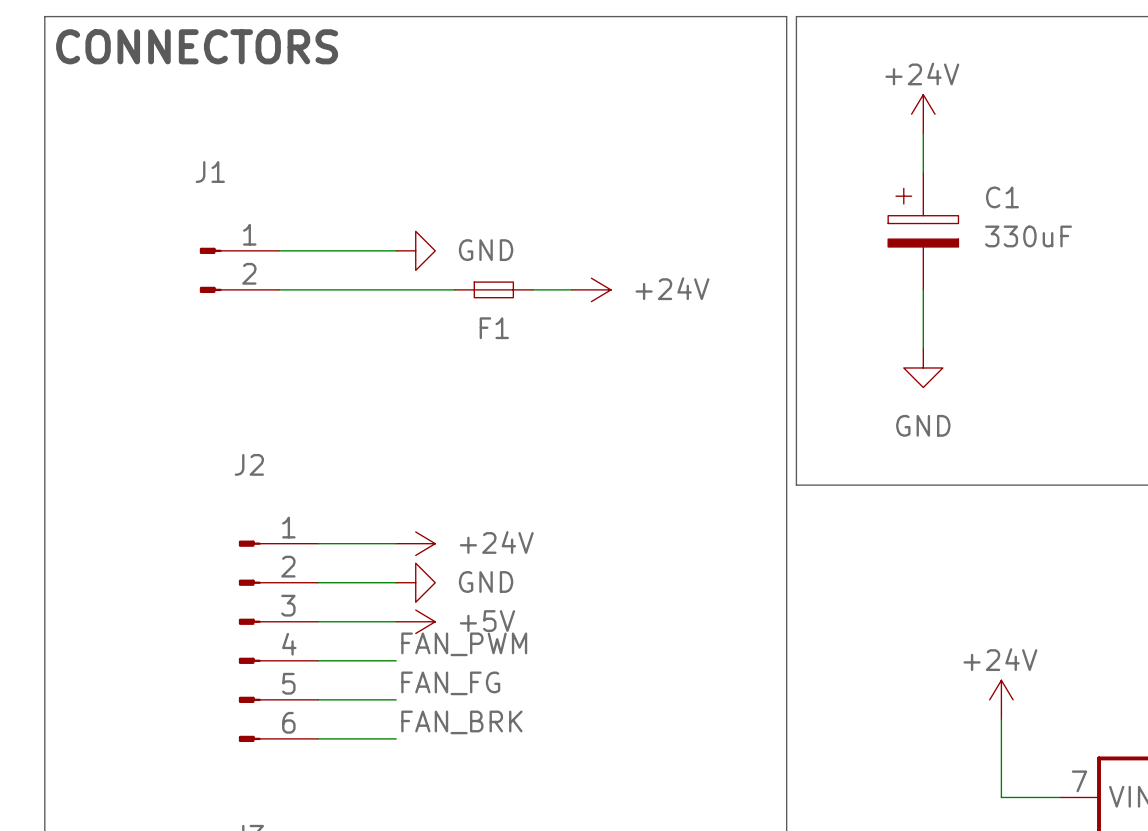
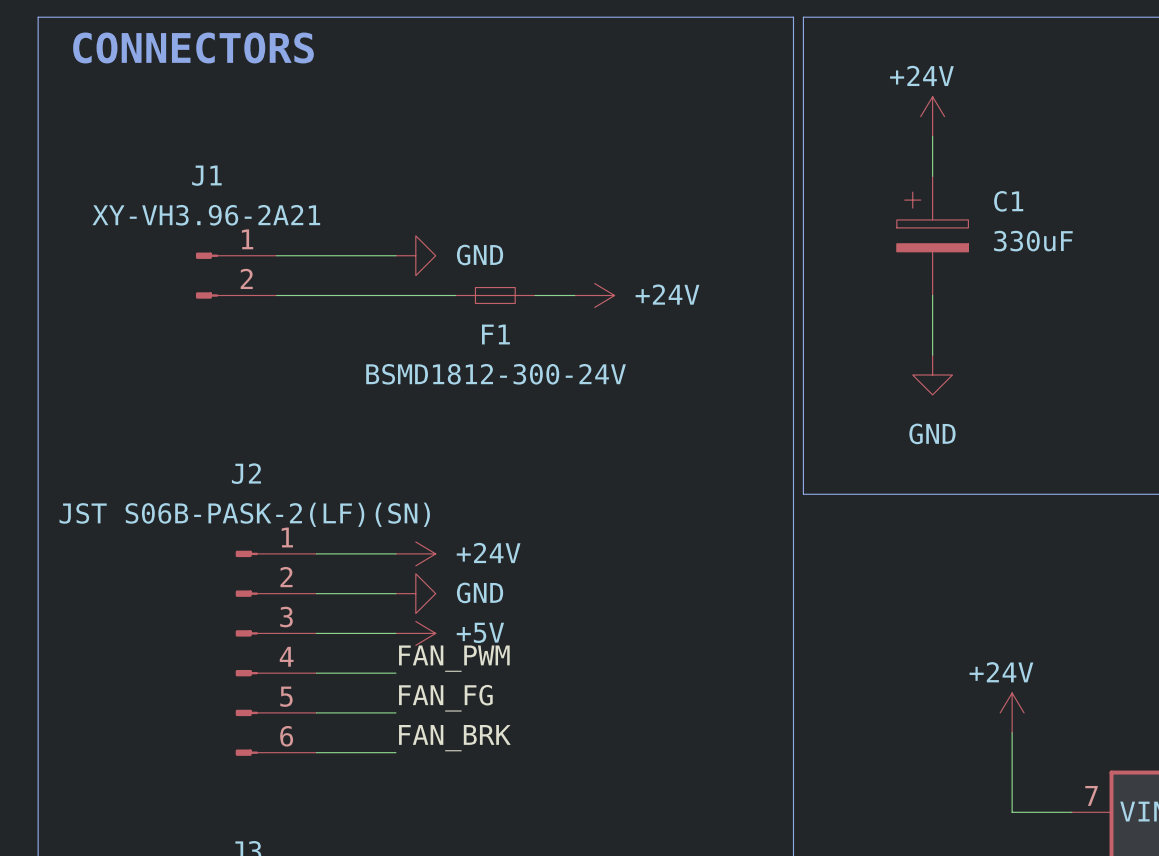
J1 value: none -> XY-VH3.96-2A21 (206, 215)
F1 value: none -> BSMD1812-300-24V (496, 374)
J2 value: none -> JST S06B-PASK-2(LF)(SN) (244, 514)

